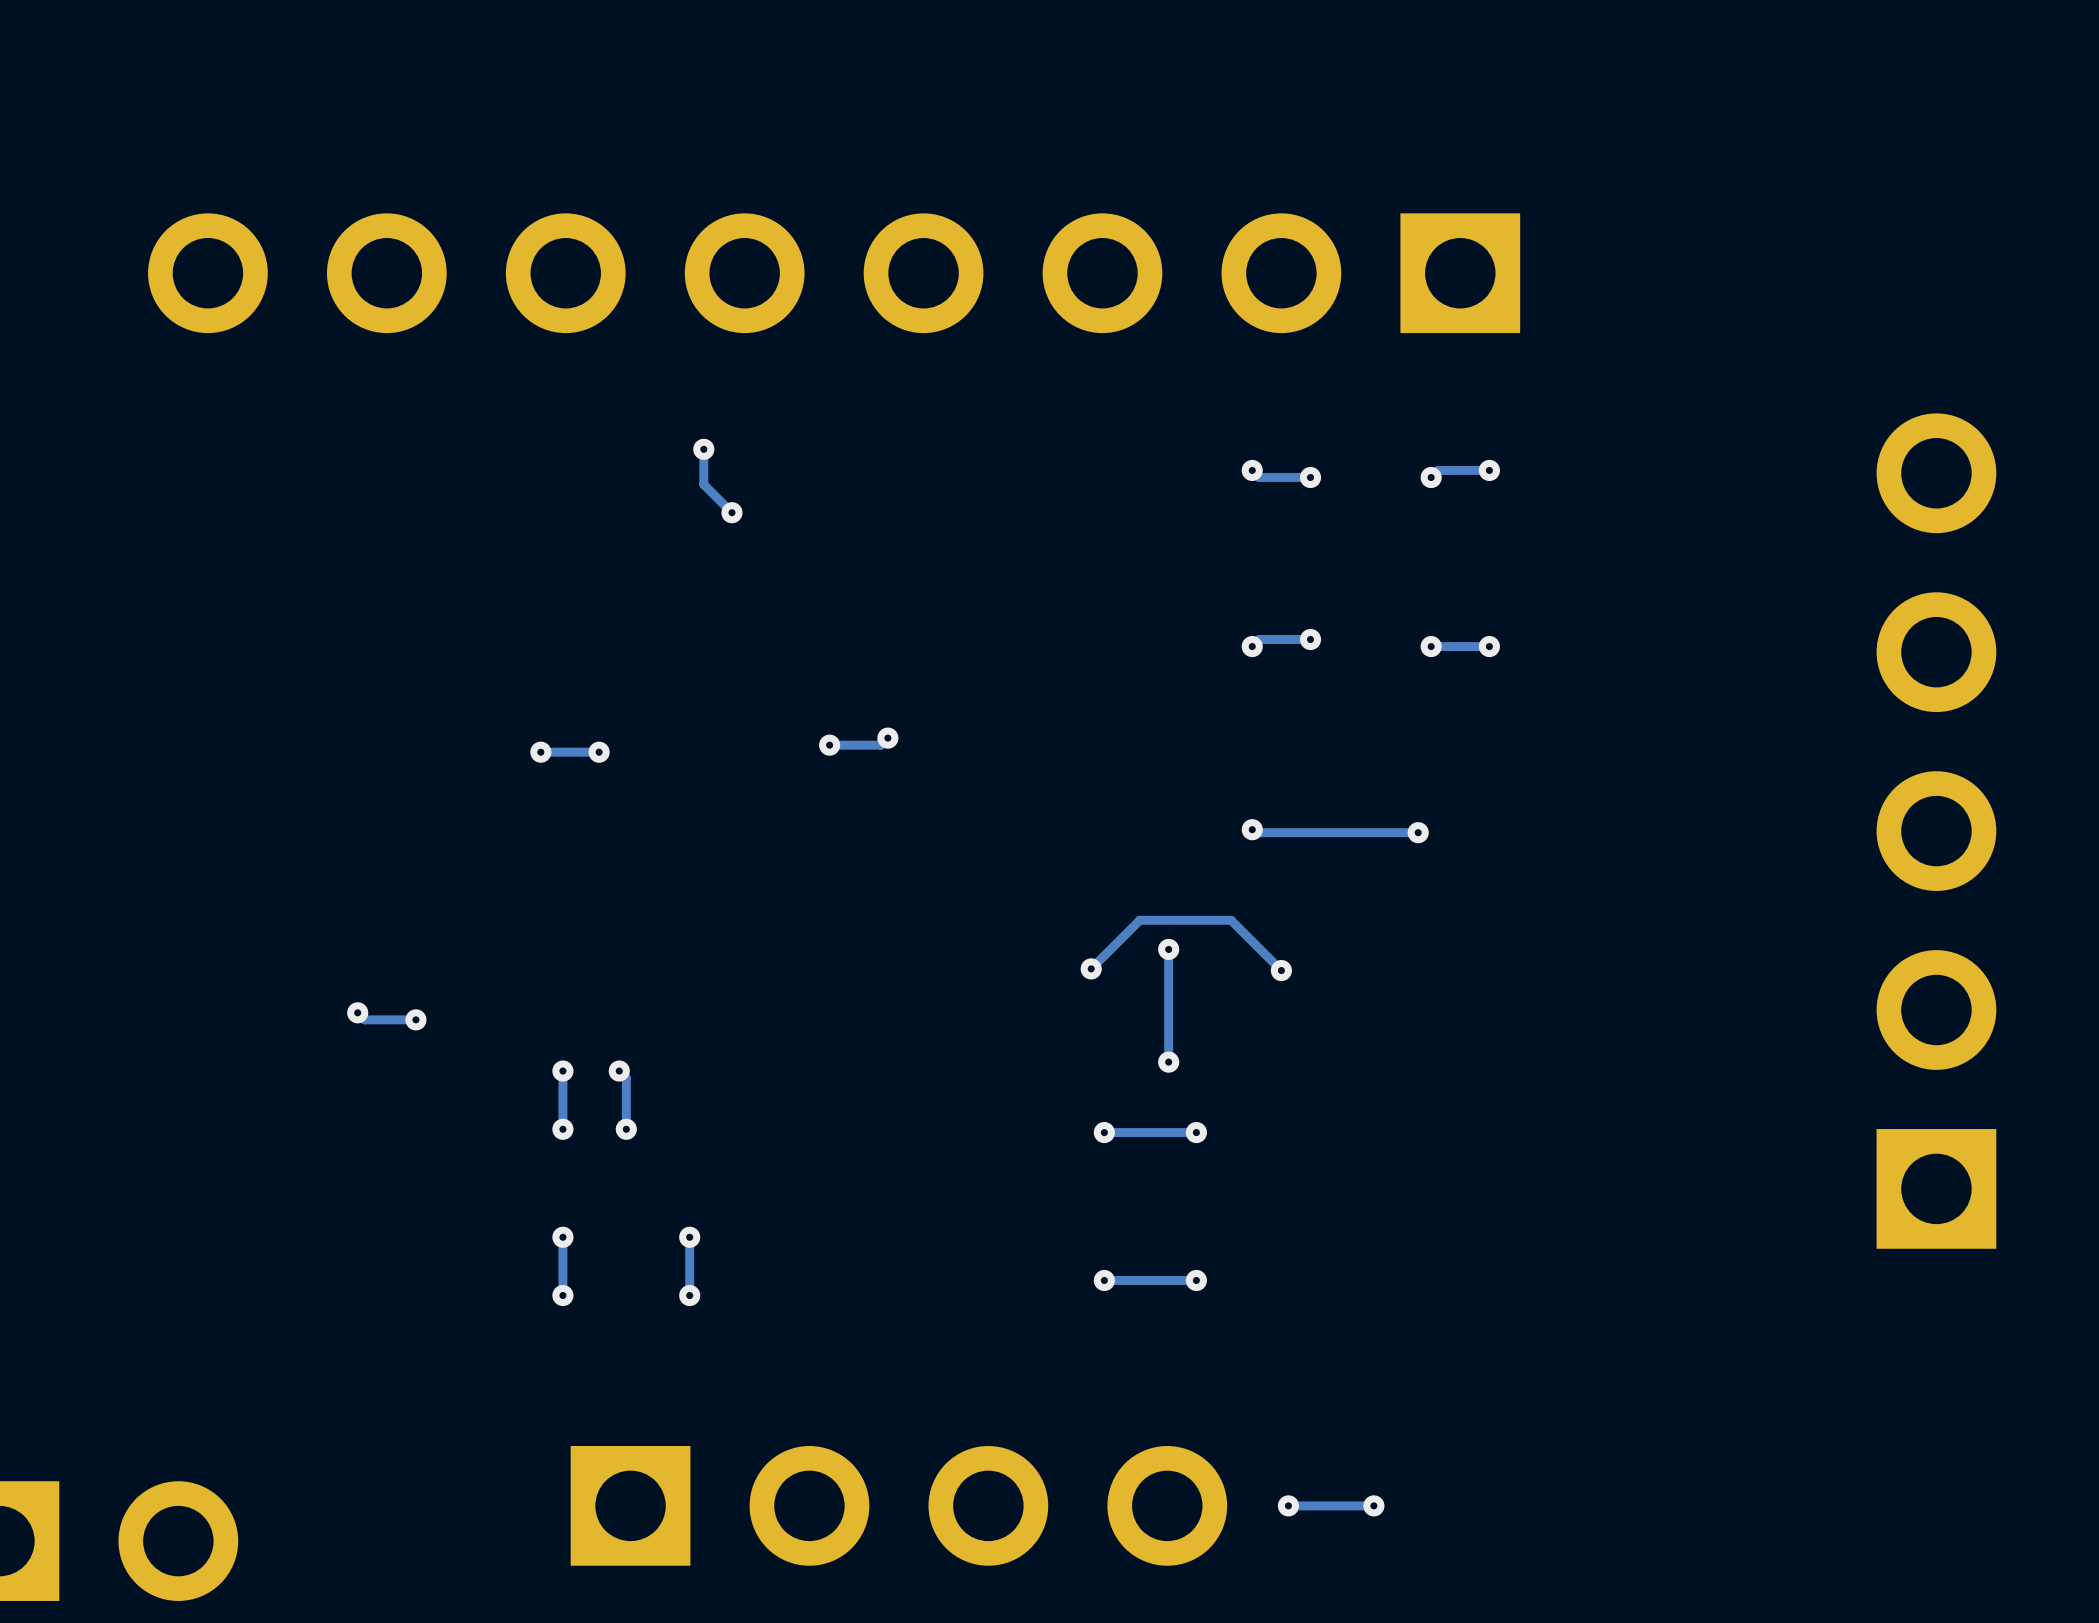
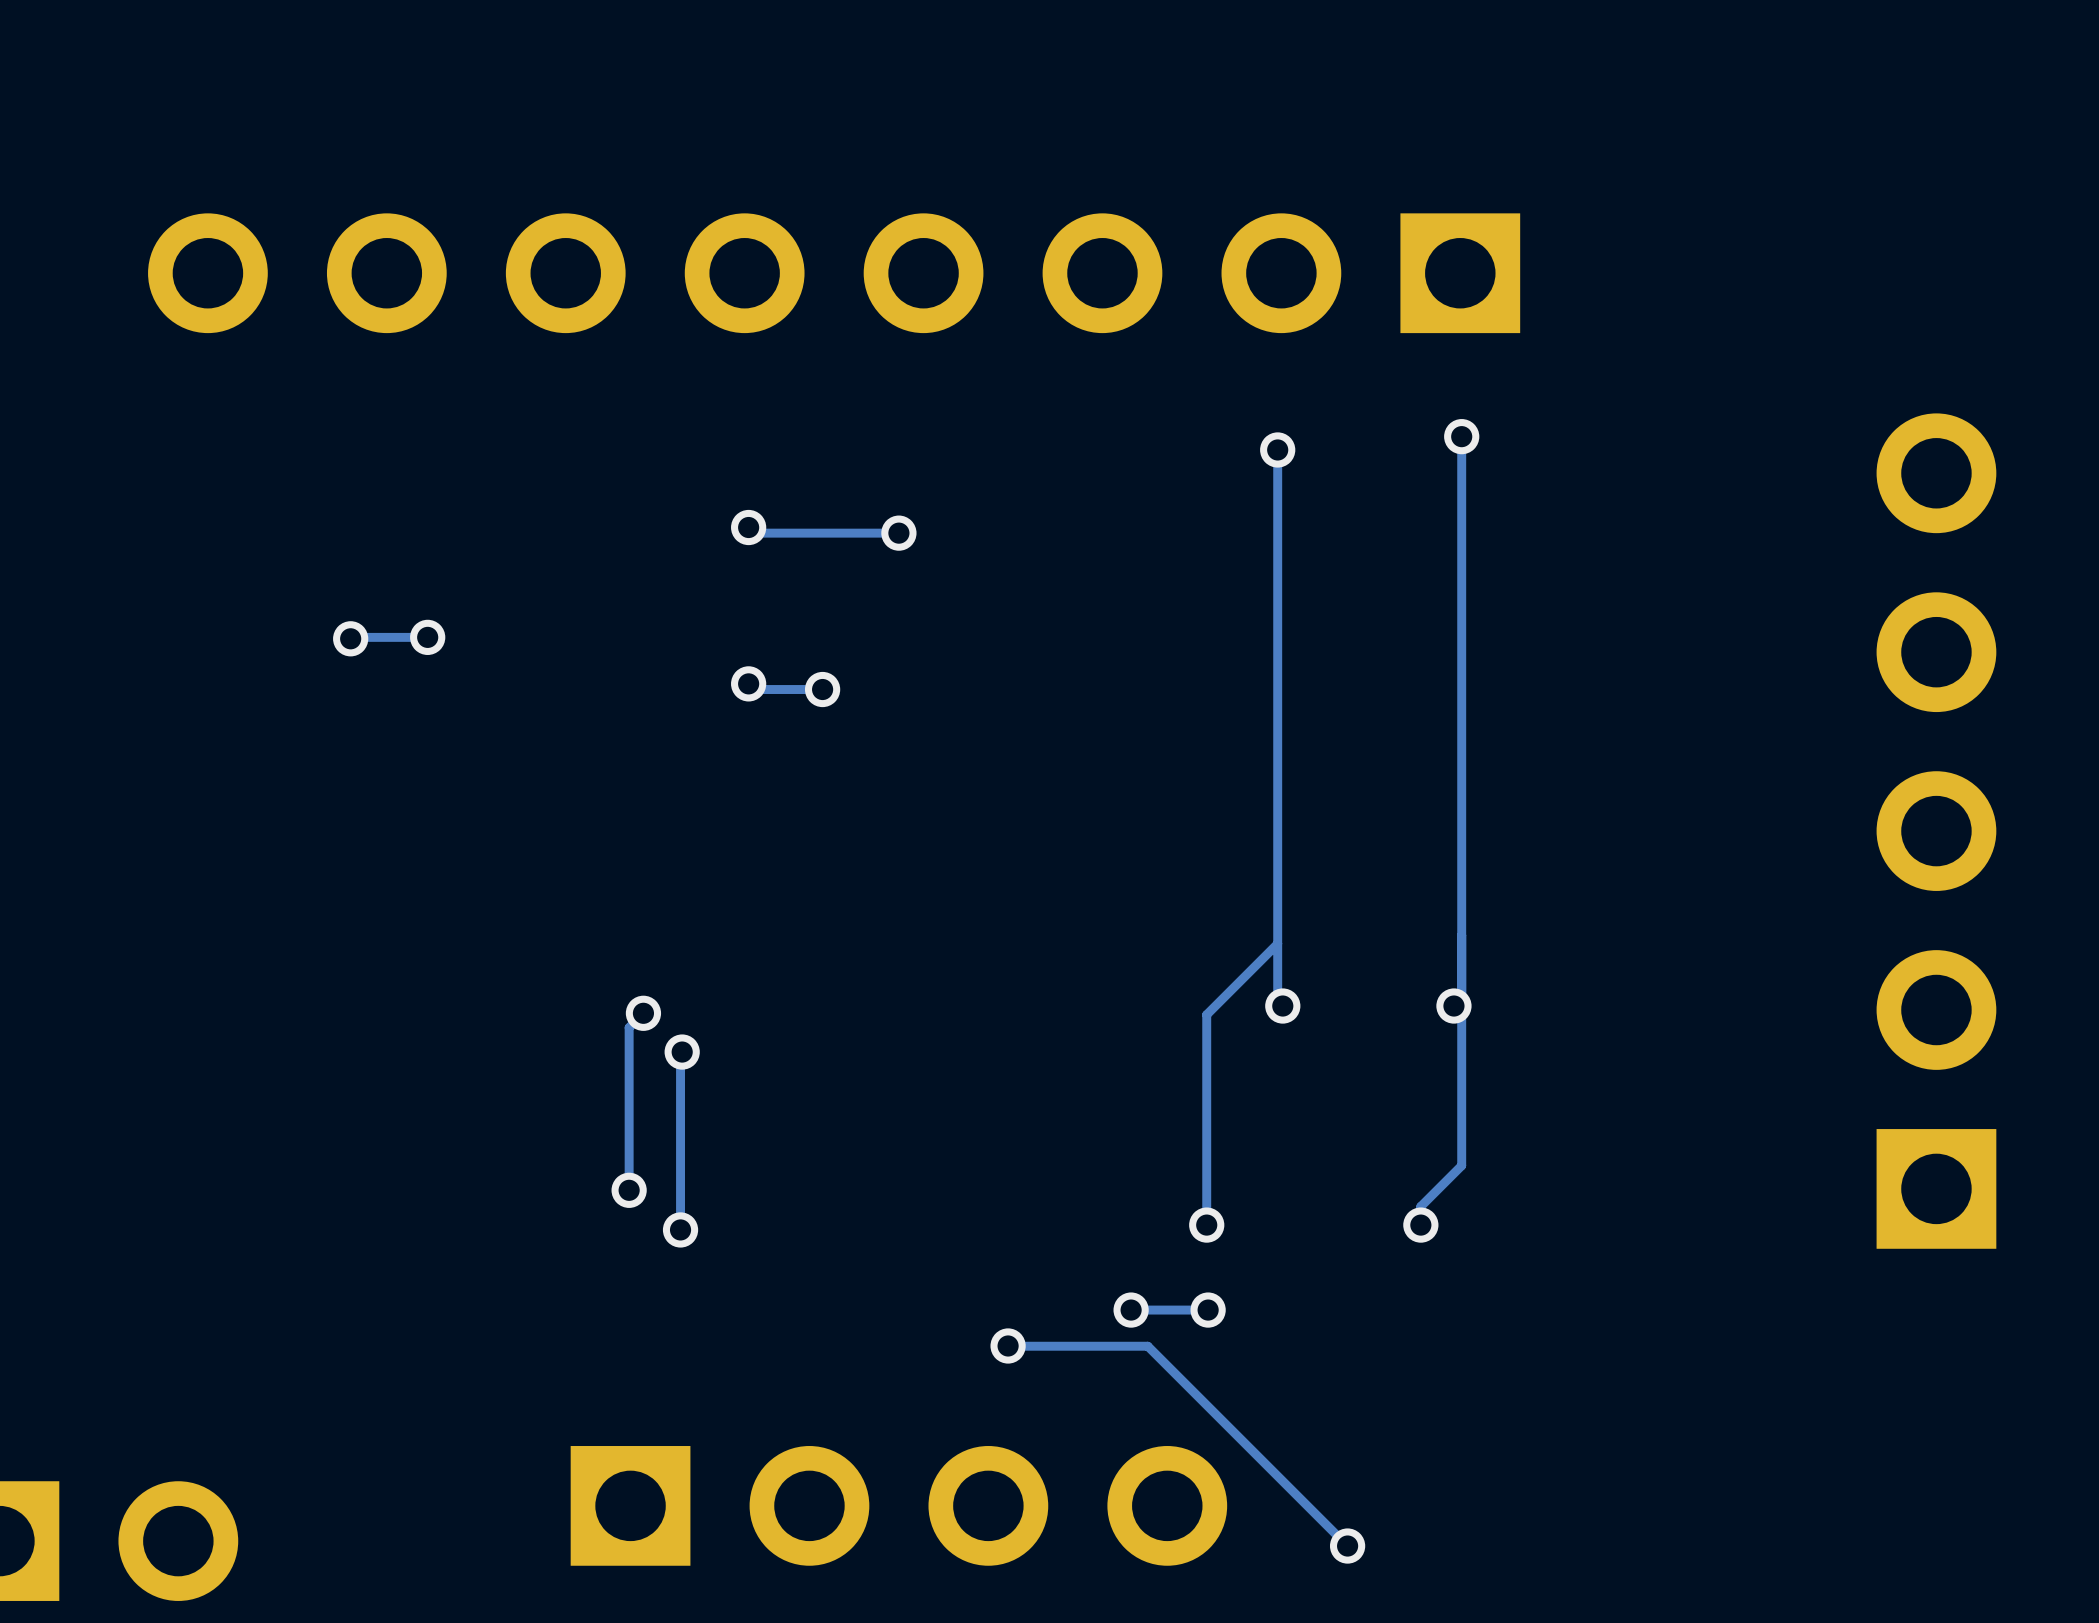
track: none -> (1461, 436) (1461, 1165) (1420, 1206) (1420, 1225)
via: none -> (1461, 436)
track: (703, 449) (703, 484) (731, 512) -> none
via: (703, 449) -> none
track: none -> (1277, 449) (1277, 1000) (1282, 1006)
track: (1252, 470) (1259, 477) (1310, 477) -> none
via position: (1252, 470) -> (1277, 449)
track: (1489, 470) (1438, 470) (1431, 477) -> none
via: (1489, 470) -> none
via: (1310, 477) -> none
via: (1431, 477) -> none
via size: [721, 502, 743, 524] -> [731, 509, 767, 546]
track: none -> (748, 527) (754, 533) (898, 533)
via: none -> (898, 533)
track: none -> (427, 637) (350, 638)
via: none -> (427, 637)
via: none -> (350, 638)
track: (1310, 639) (1259, 639) (1252, 646) -> none
via: (1310, 639) -> none
via: (1252, 646) -> none
via: (1431, 646) -> none
track: (1489, 646) (1431, 646) -> none
via: (1489, 646) -> none
track: none -> (748, 683) (754, 689) (822, 689)
via: none -> (748, 683)
via: none -> (822, 689)
track: (887, 738) (880, 745) (829, 745) -> none
via: (887, 738) -> none
via: (829, 745) -> none
via: (540, 752) -> none
track: (599, 752) (540, 752) -> none
via: (599, 752) -> none
track: (1252, 829) (1255, 832) (1418, 832) -> none
via: (1252, 829) -> none
via: (1418, 832) -> none
track: none -> (1277, 943) (1206, 1014) (1206, 1225)
track: (1168, 949) (1168, 1062) -> none
via: (1168, 949) -> none
track: (1091, 968) (1139, 920) (1231, 920) (1281, 970) -> none
via: (1091, 968) -> none
via: (1281, 970) -> none
via: none -> (1282, 1006)
via: none -> (1453, 1006)
track: (357, 1012) (364, 1019) (415, 1019) -> none
via: (357, 1012) -> none
track: none -> (643, 1013) (629, 1027) (629, 1190)
via: none -> (643, 1013)
via: (415, 1019) -> none
track: none -> (682, 1052) (680, 1053) (680, 1229)
via: none -> (682, 1052)
via: (1168, 1062) -> none
track: (562, 1071) (562, 1129) -> none
via: (562, 1071) -> none
track: (619, 1071) (626, 1078) (626, 1129) -> none
via: (619, 1071) -> none
via: (562, 1129) -> none
via: (626, 1129) -> none
via: (1104, 1132) -> none
track: (1196, 1132) (1104, 1132) -> none
via: (1196, 1132) -> none
via: none -> (629, 1190)
via: none -> (1206, 1225)
via: none -> (1420, 1225)
via size: [679, 1226, 701, 1248] -> [662, 1212, 699, 1248]
track: (562, 1237) (562, 1295) -> none
via: (562, 1237) -> none
track: (689, 1237) (689, 1295) -> none
via: (1104, 1280) -> none
track: (1196, 1280) (1104, 1280) -> none
via: (1196, 1280) -> none
via: (562, 1295) -> none
via: (689, 1295) -> none
via: none -> (1131, 1310)
track: none -> (1208, 1310) (1131, 1310)
via: none -> (1208, 1310)
via: none -> (1008, 1345)
track: none -> (1008, 1346) (1147, 1346) (1347, 1546)
via: (1288, 1505) -> none
track: (1373, 1505) (1288, 1505) -> none
via: (1373, 1505) -> none
via: none -> (1347, 1546)

